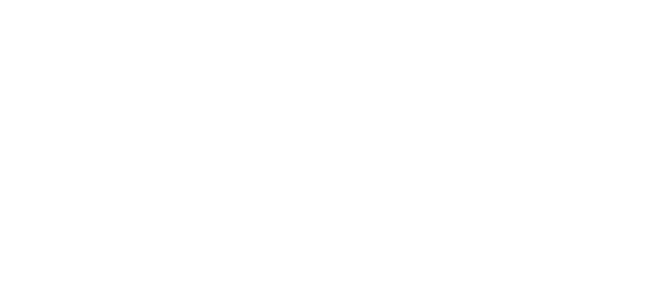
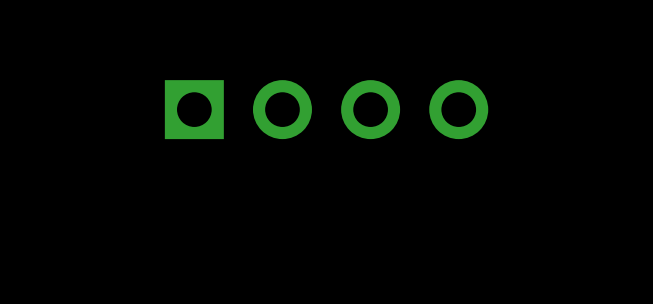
part: none -> (326, 109)

